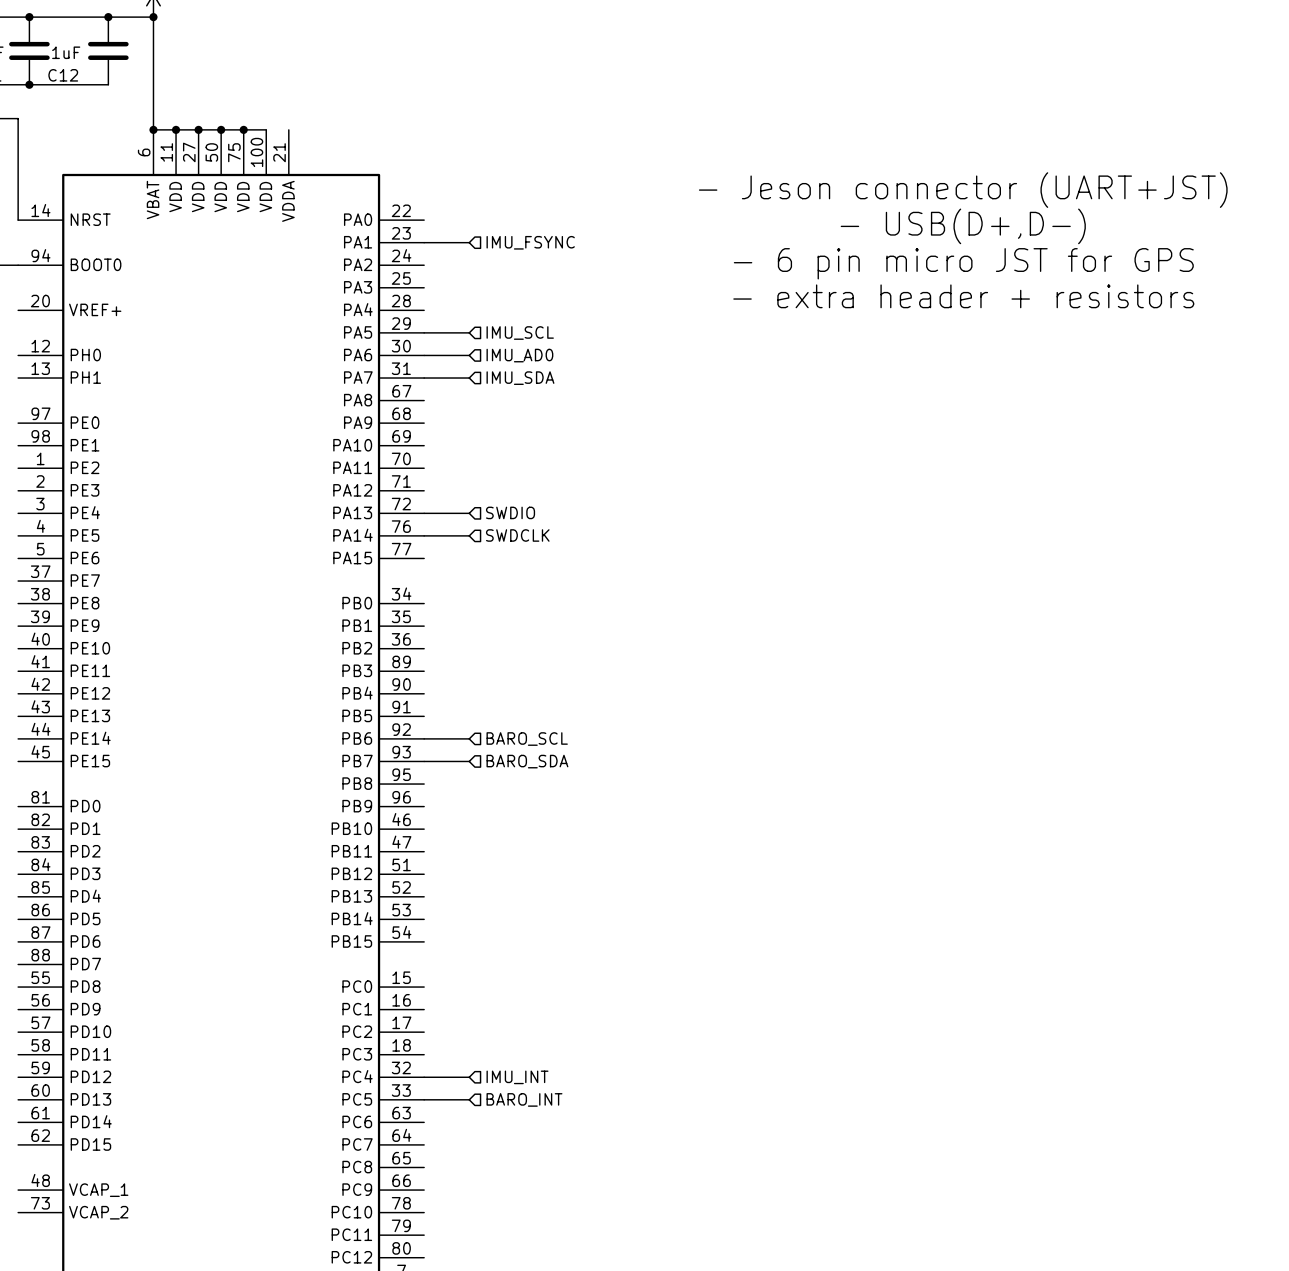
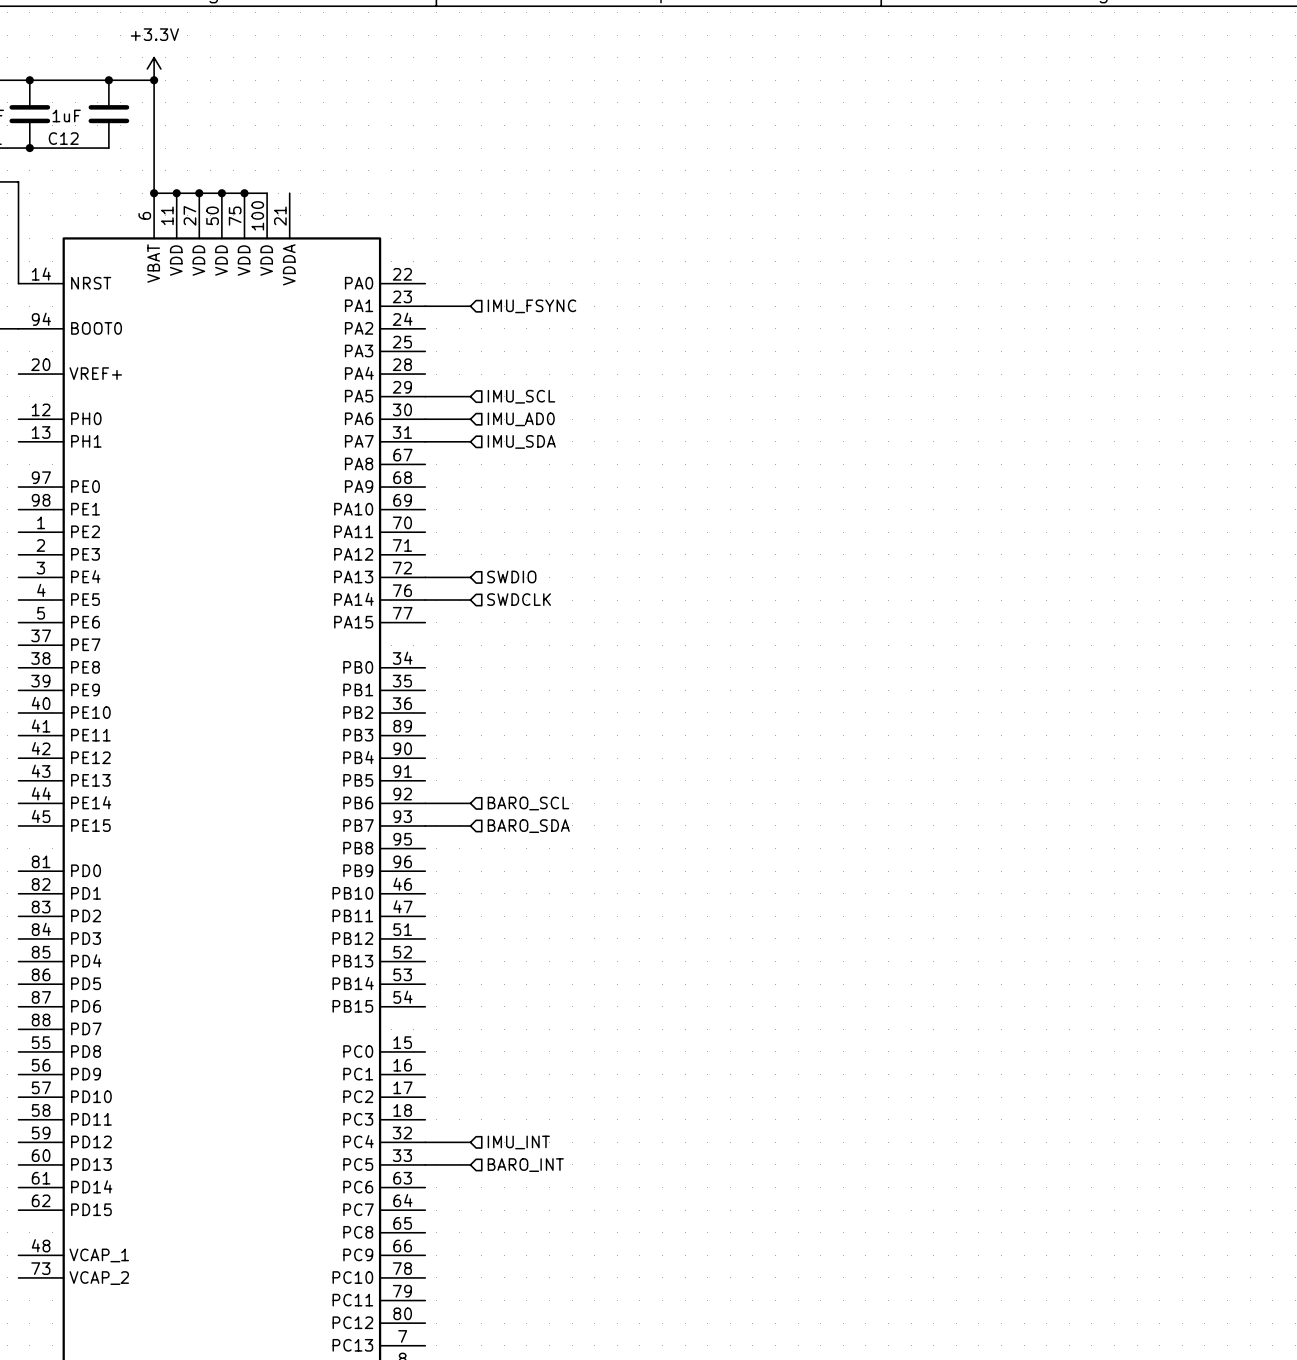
text: - Jeson connector (UART+JST) (963, 190) -> none
text: - USB(D+,D-) (963, 226) -> none
text: - 6 pin micro JST for GPS (963, 263) -> none
text: - extra header + resistors (963, 296) -> none

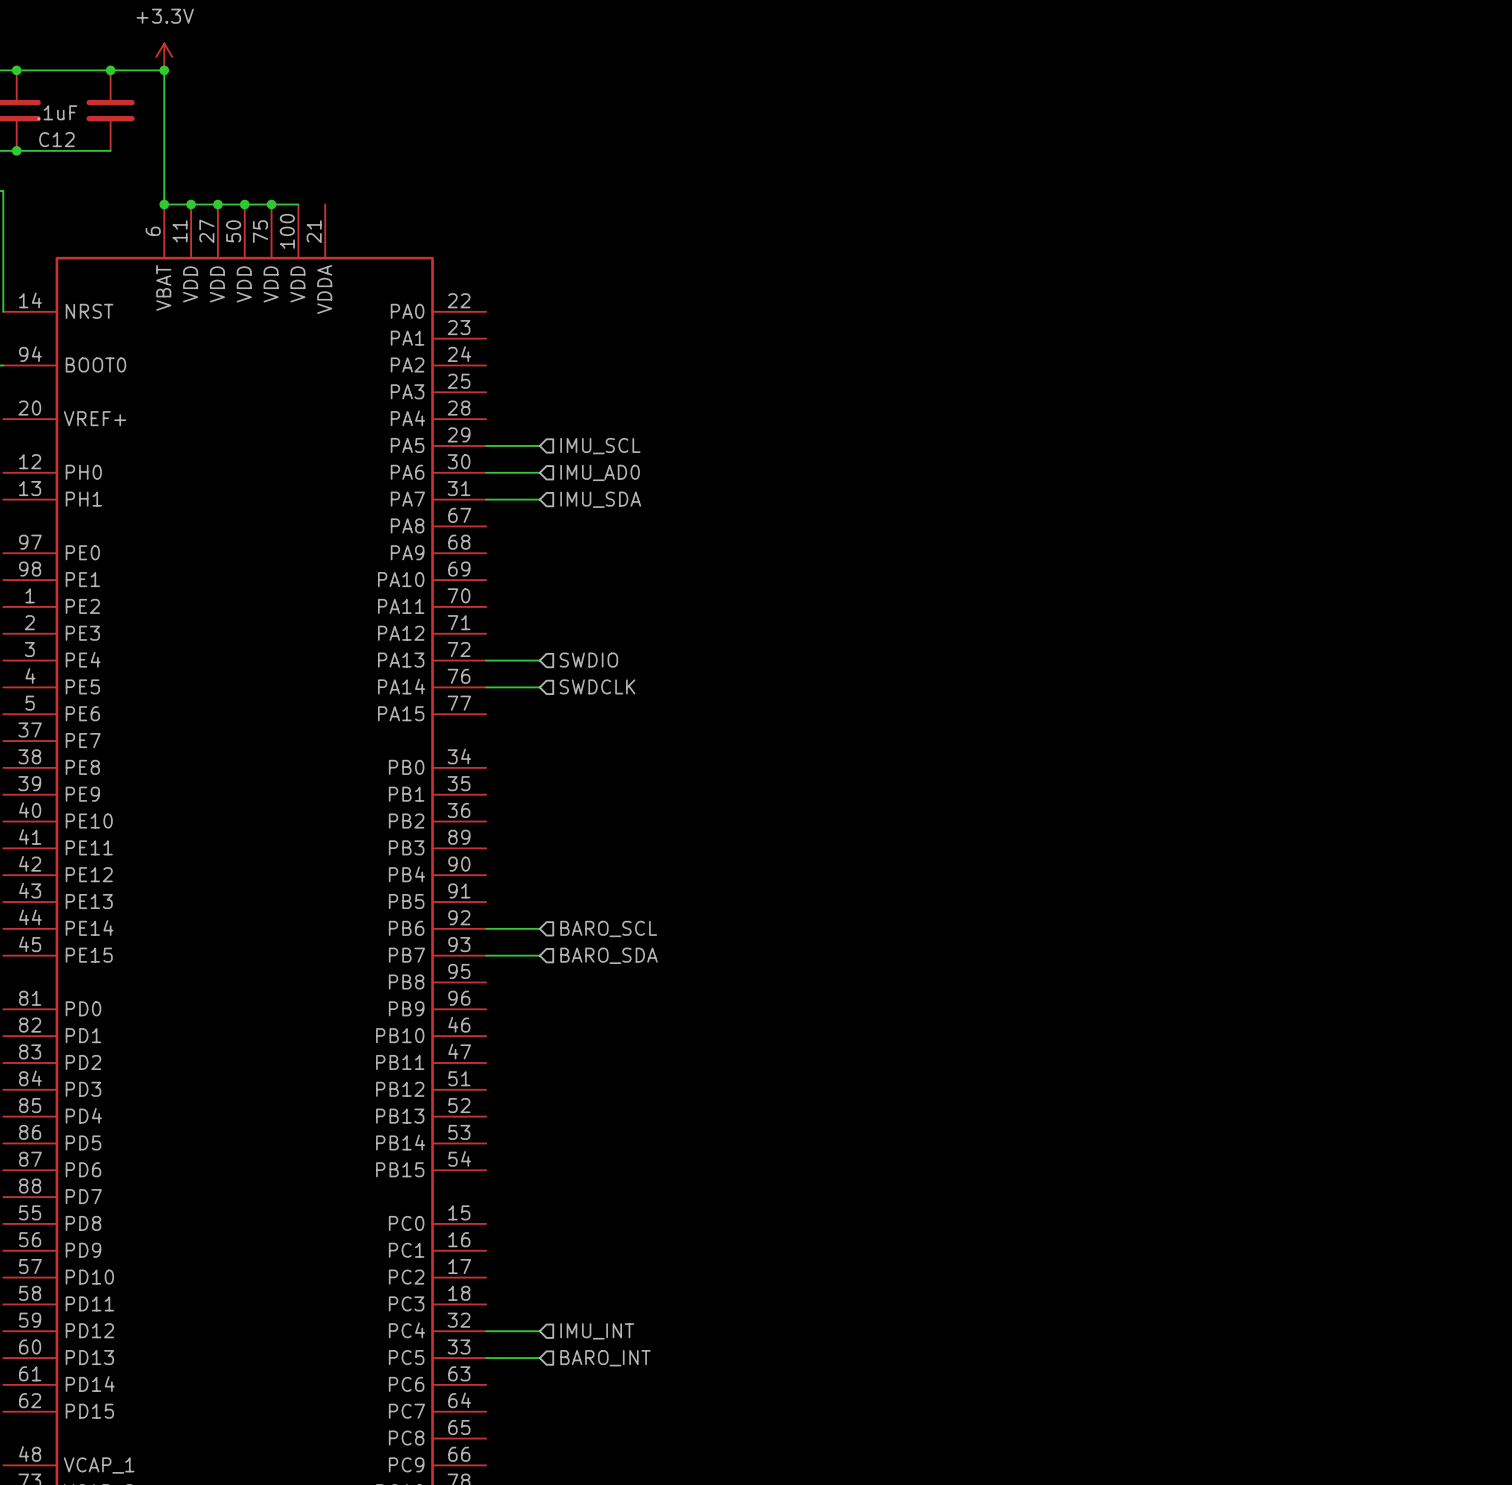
wire: (425, 306) (470, 306) -> none
hierarchical label: IMU_FSYNC (531, 306) -> none

